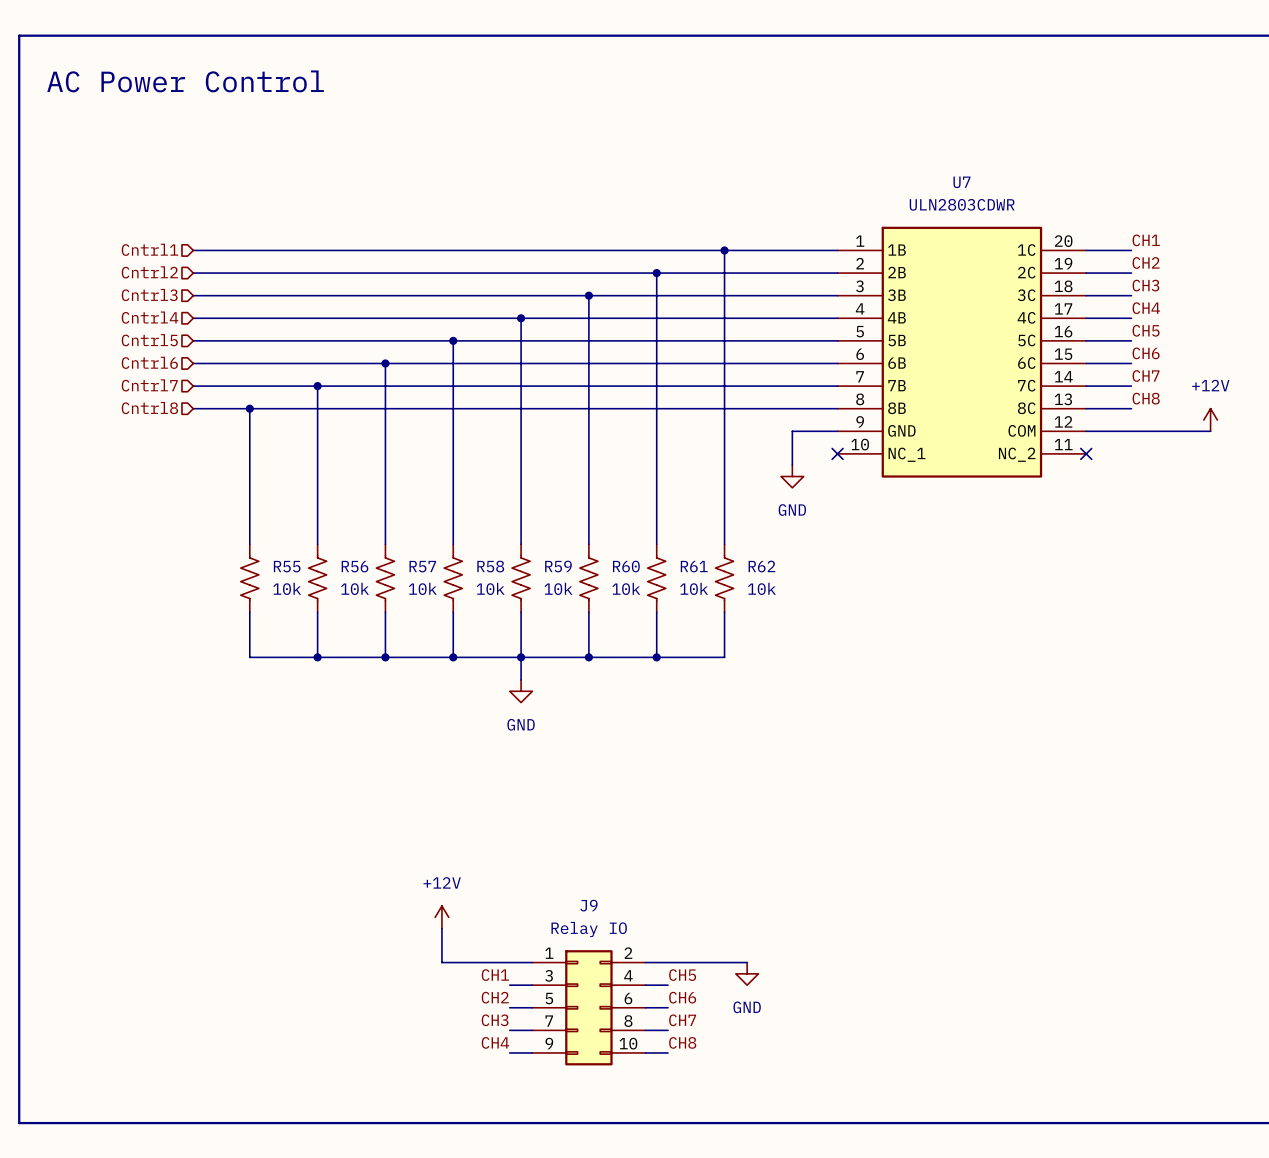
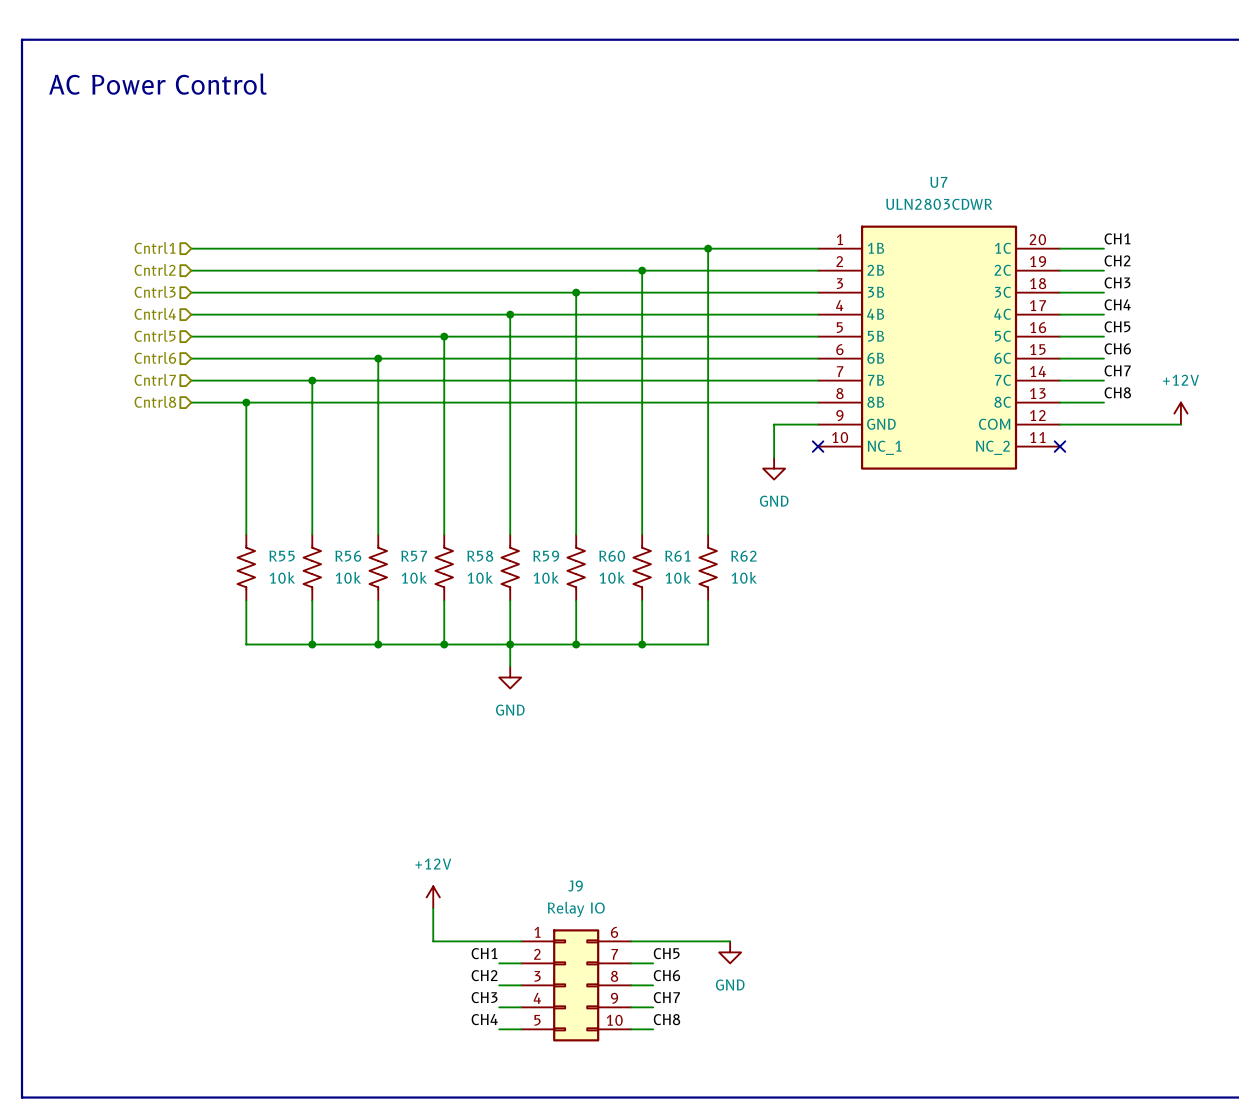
J9 pin number: 2 (628, 953) -> 6 (614, 932)
J9 pin number: 3 (549, 975) -> 2 (537, 954)
J9 pin number: 4 (628, 975) -> 7 (614, 954)
J9 pin number: 5 (549, 998) -> 3 (537, 976)
J9 pin number: 6 (628, 998) -> 8 (614, 976)
J9 pin number: 7 (549, 1021) -> 4 (537, 998)
J9 pin number: 8 (628, 1021) -> 9 (614, 998)
J9 pin number: 9 (549, 1043) -> 5 (537, 1020)

